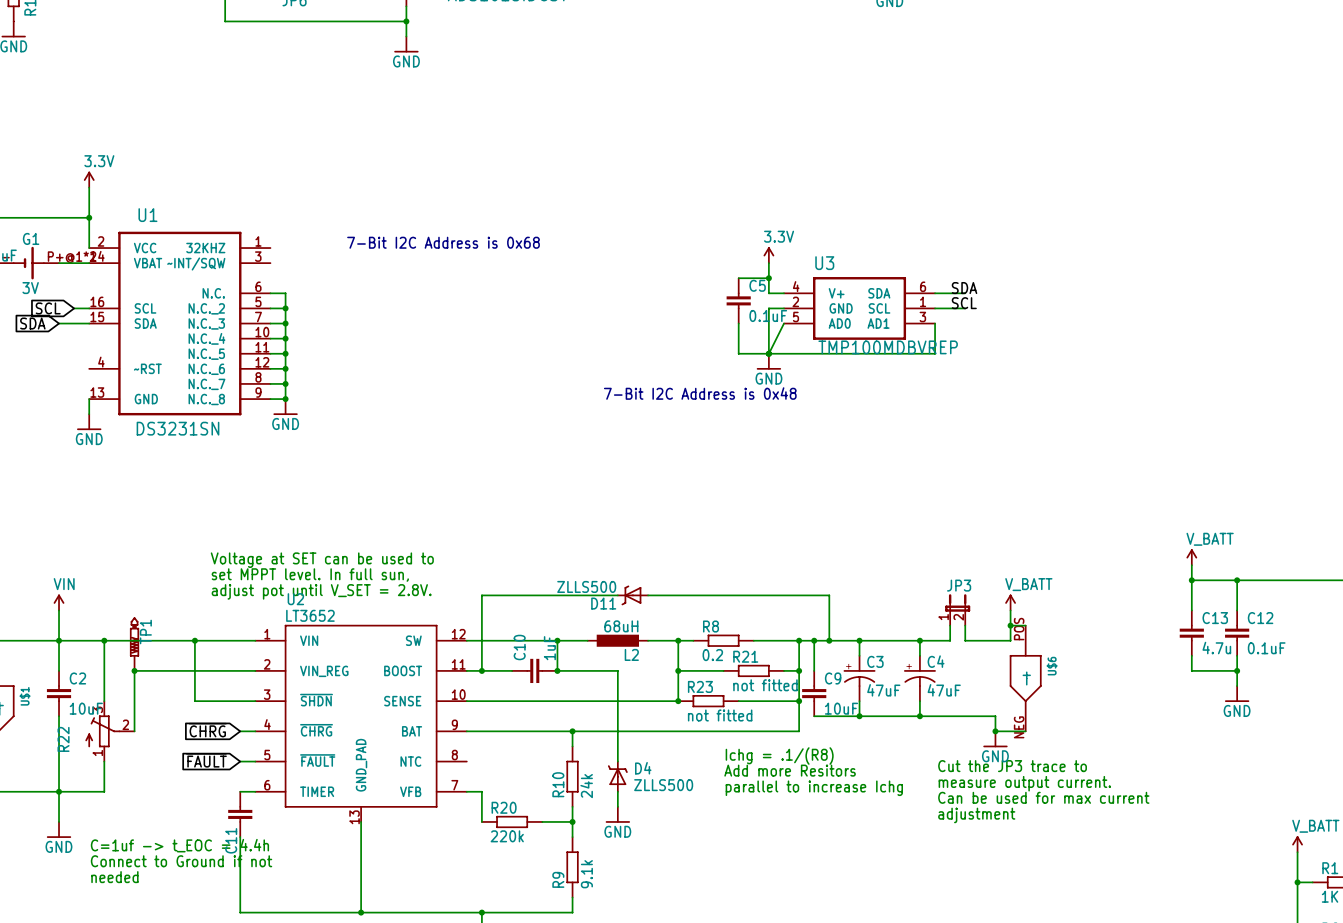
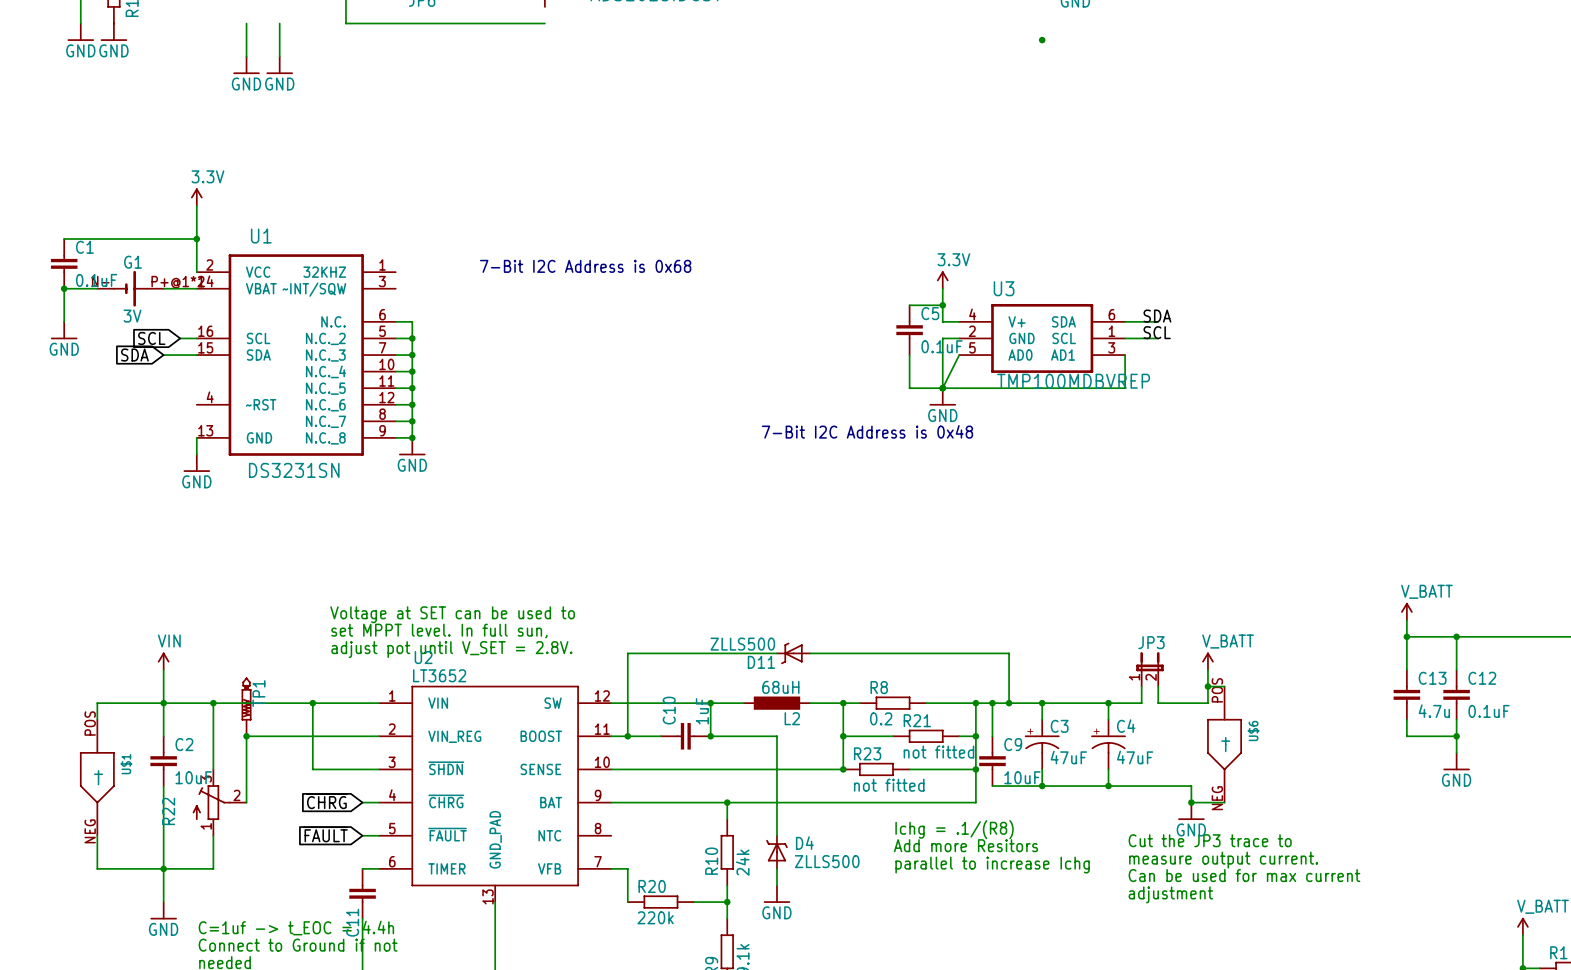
wire: (406, 6) (406, 36) -> none
wire: none -> (246, 23) (246, 56)
wire: none -> (279, 23) (279, 56)
junction: (406, 21) -> none
junction: none -> (1042, 40)
power symbol: GND (406, 44) -> none
power symbol: none -> GND (246, 65)
power symbol: none -> GND (279, 65)

